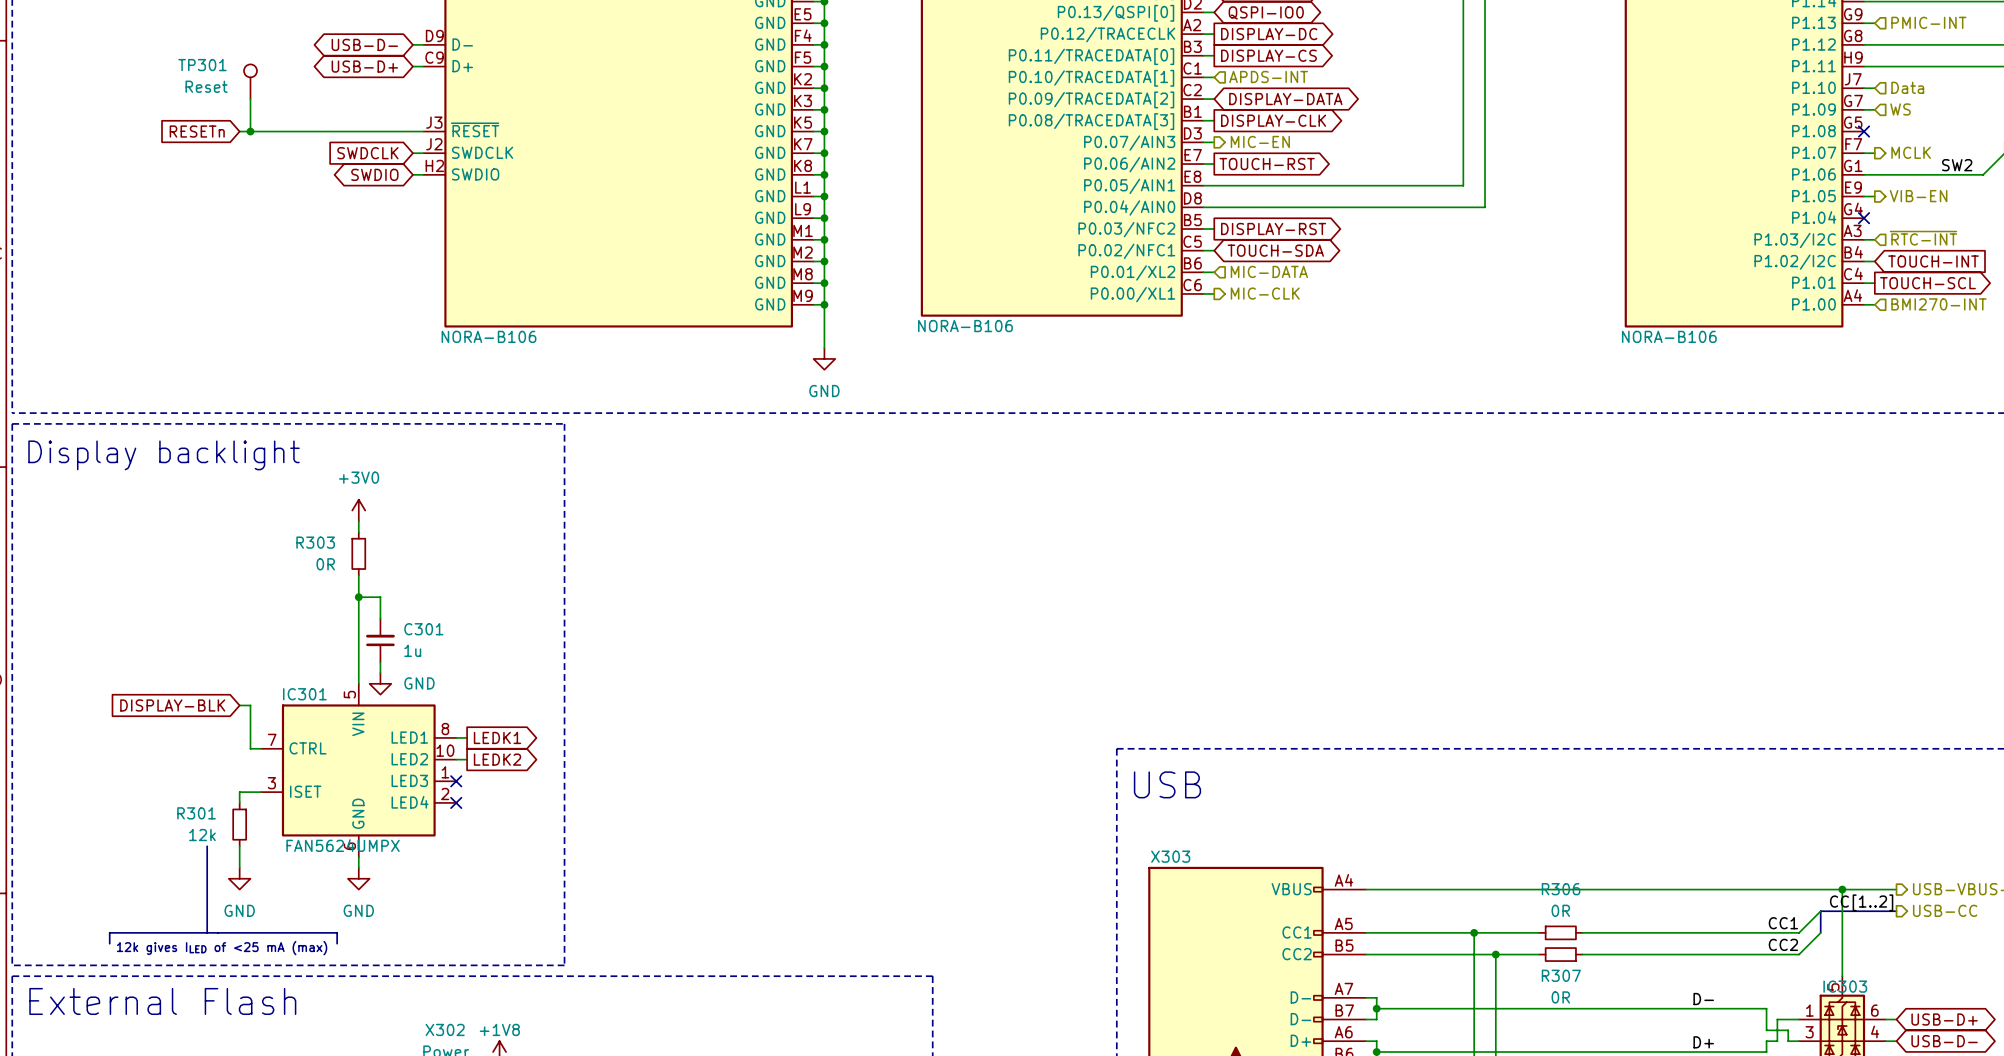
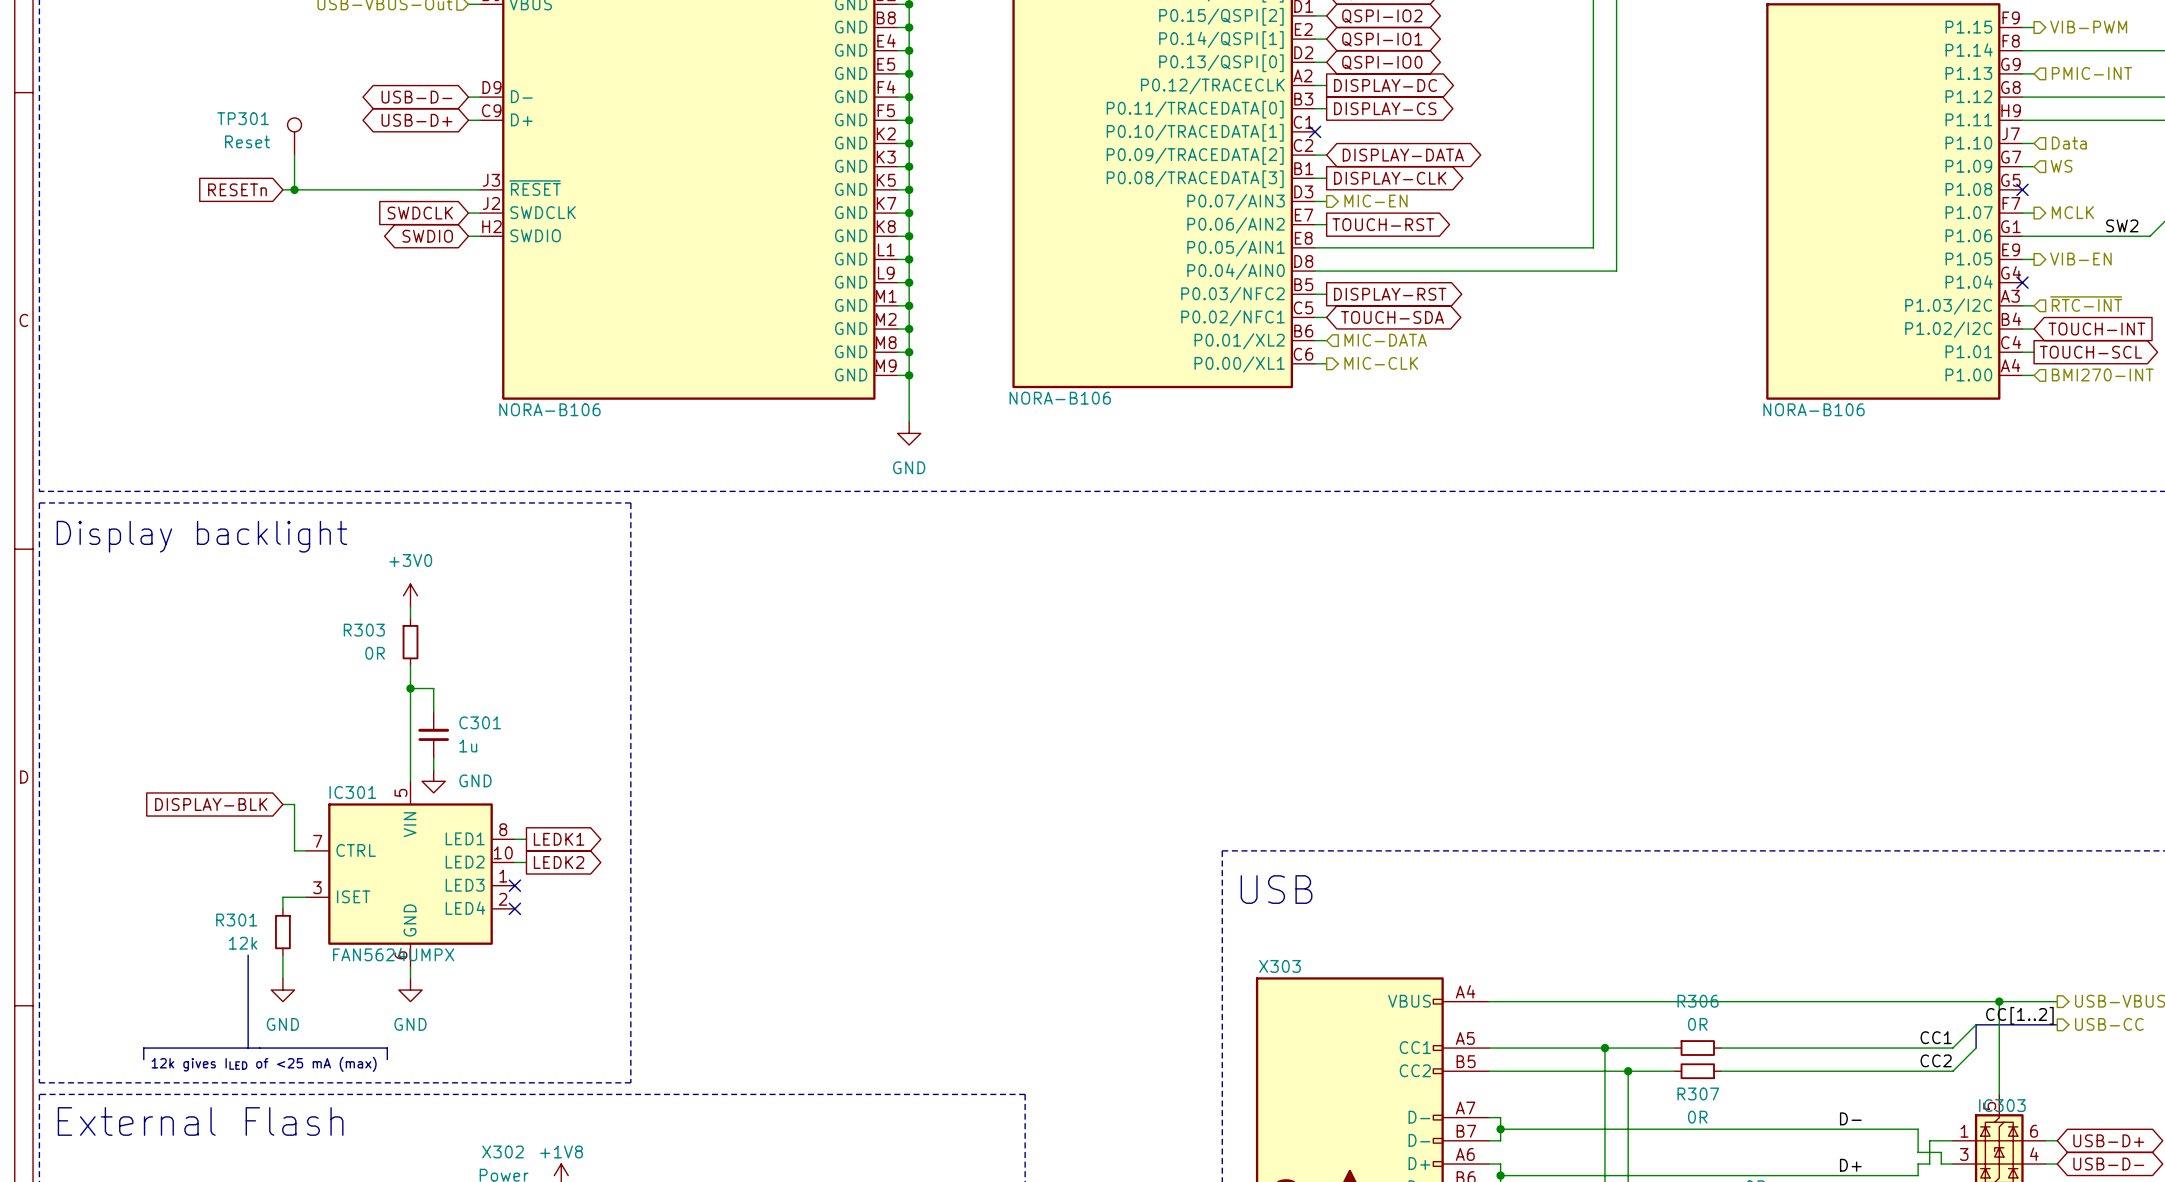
hierarchical label: APDS-INT (1268, 76) -> none
wire: (1203, 77) (1214, 77) -> none
no-connect mark: none -> (1315, 131)

